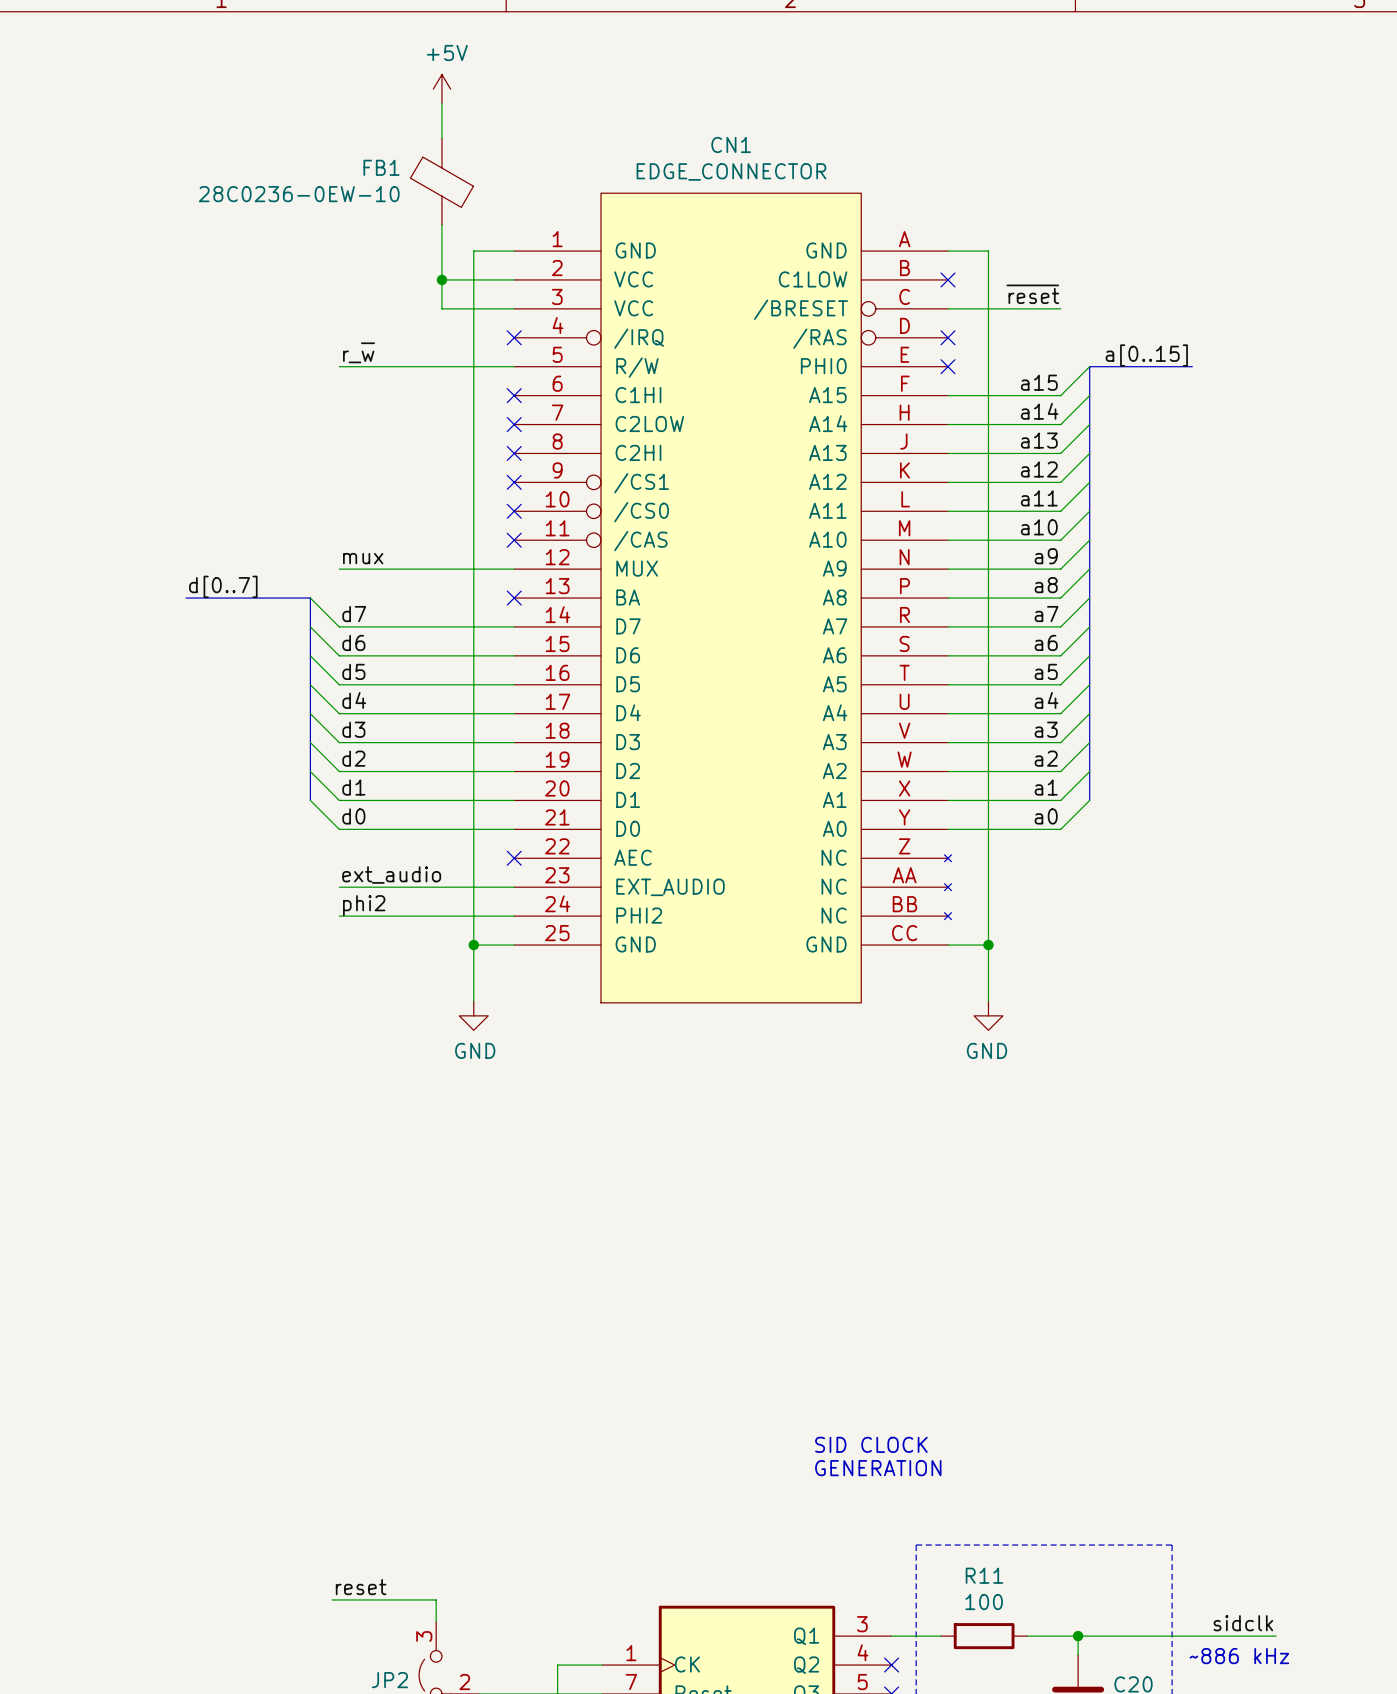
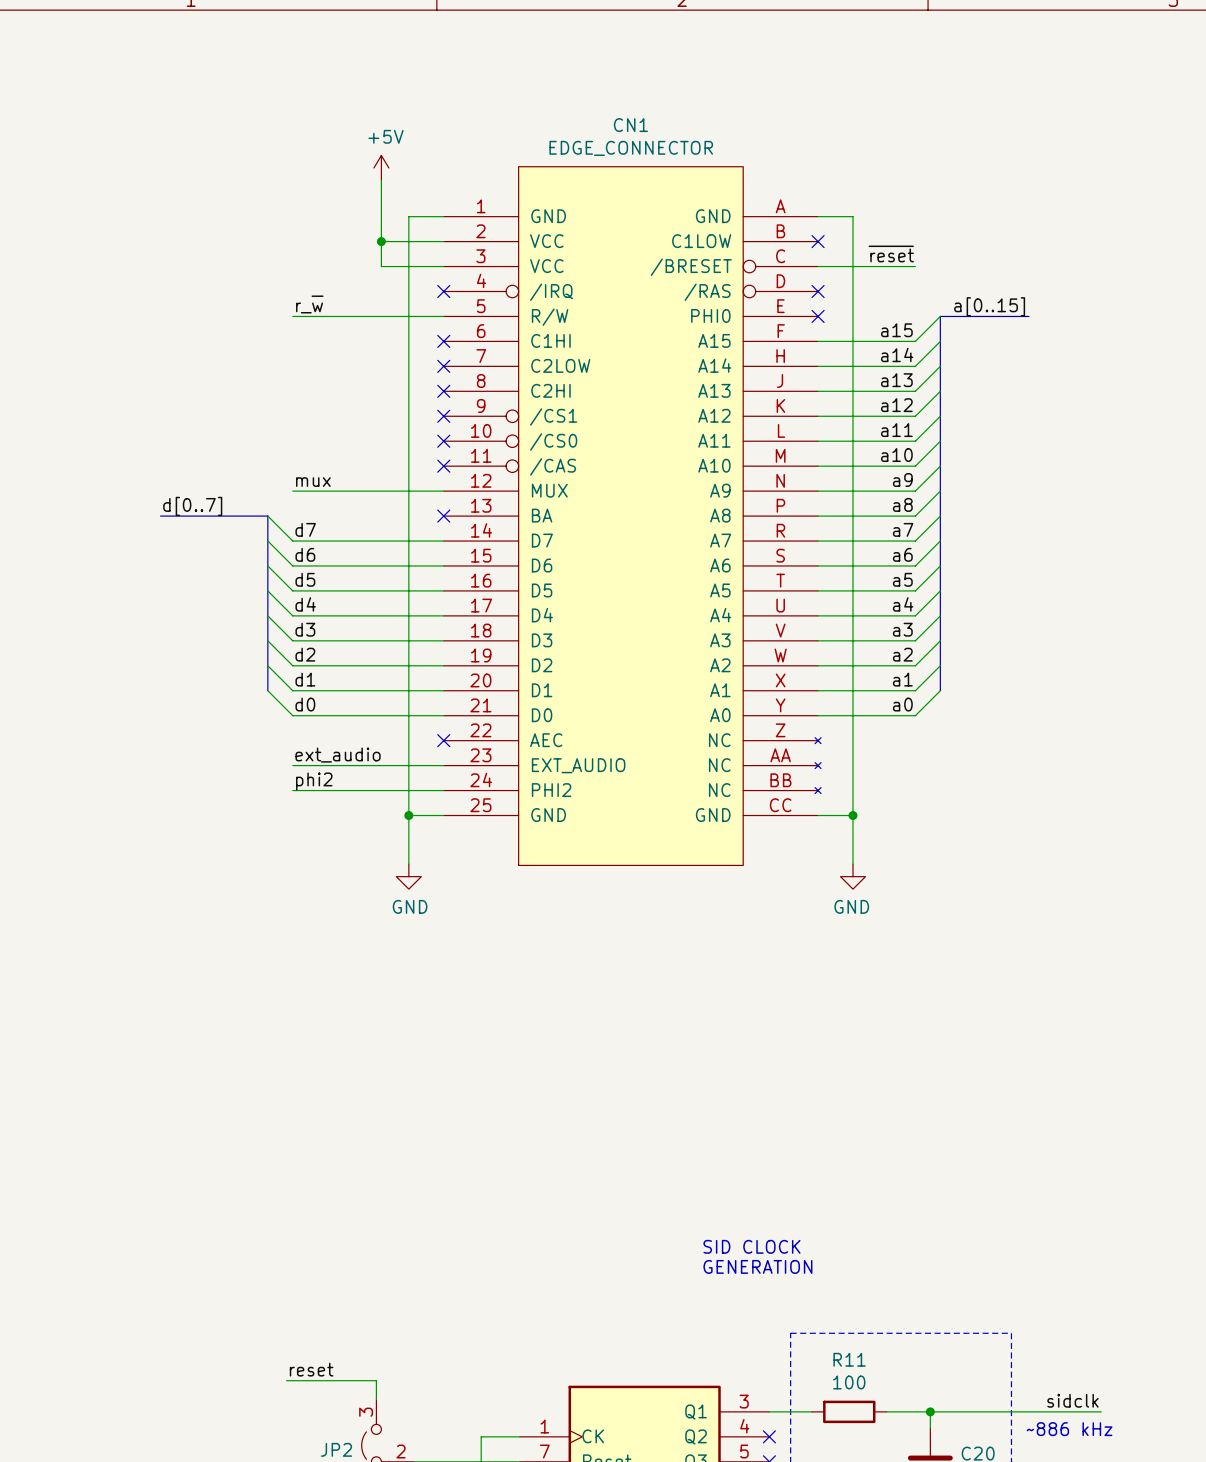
power symbol position: +5V (441, 89) -> +5V (381, 167)
wire: (441, 103) (441, 138) -> none
FB1: 28C0236-0EW-10 (441, 181) -> none

